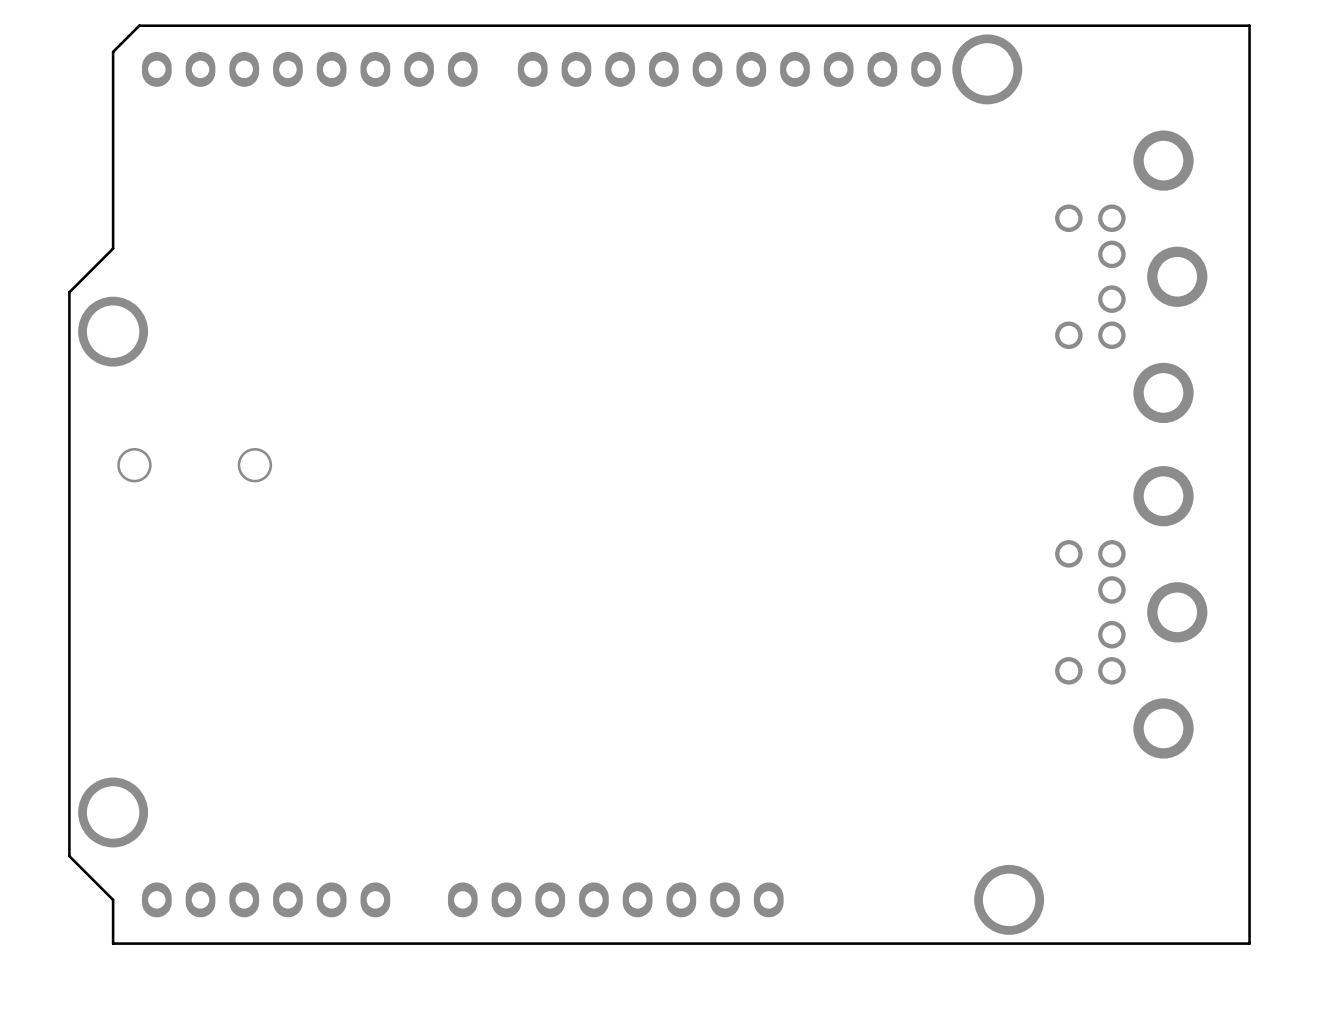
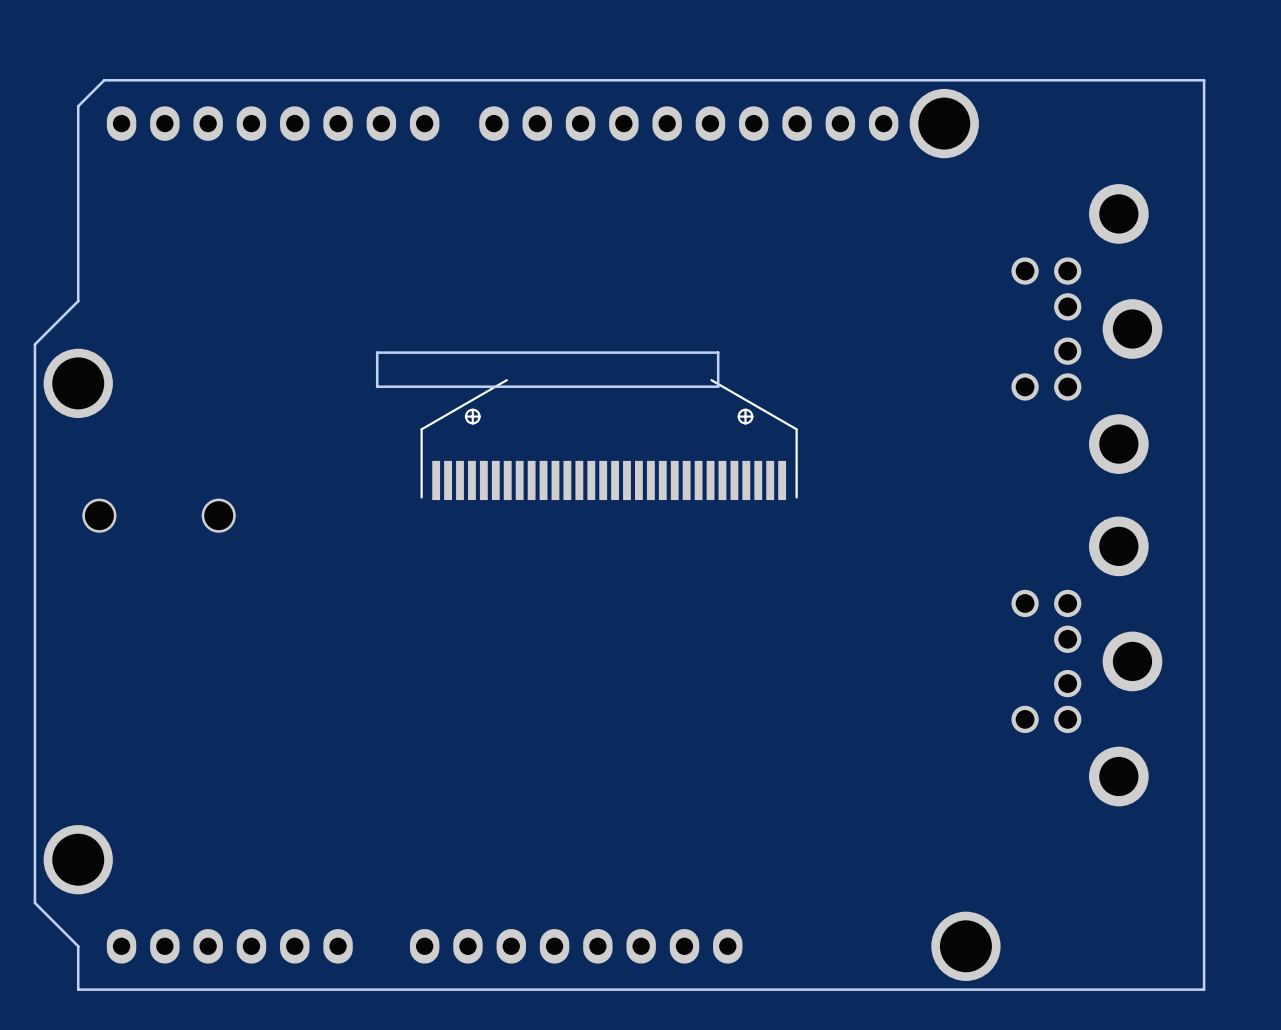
board edge: none -> (718, 352) (377, 352) (377, 386) (718, 386) (718, 352)
part: none -> (609, 439)

